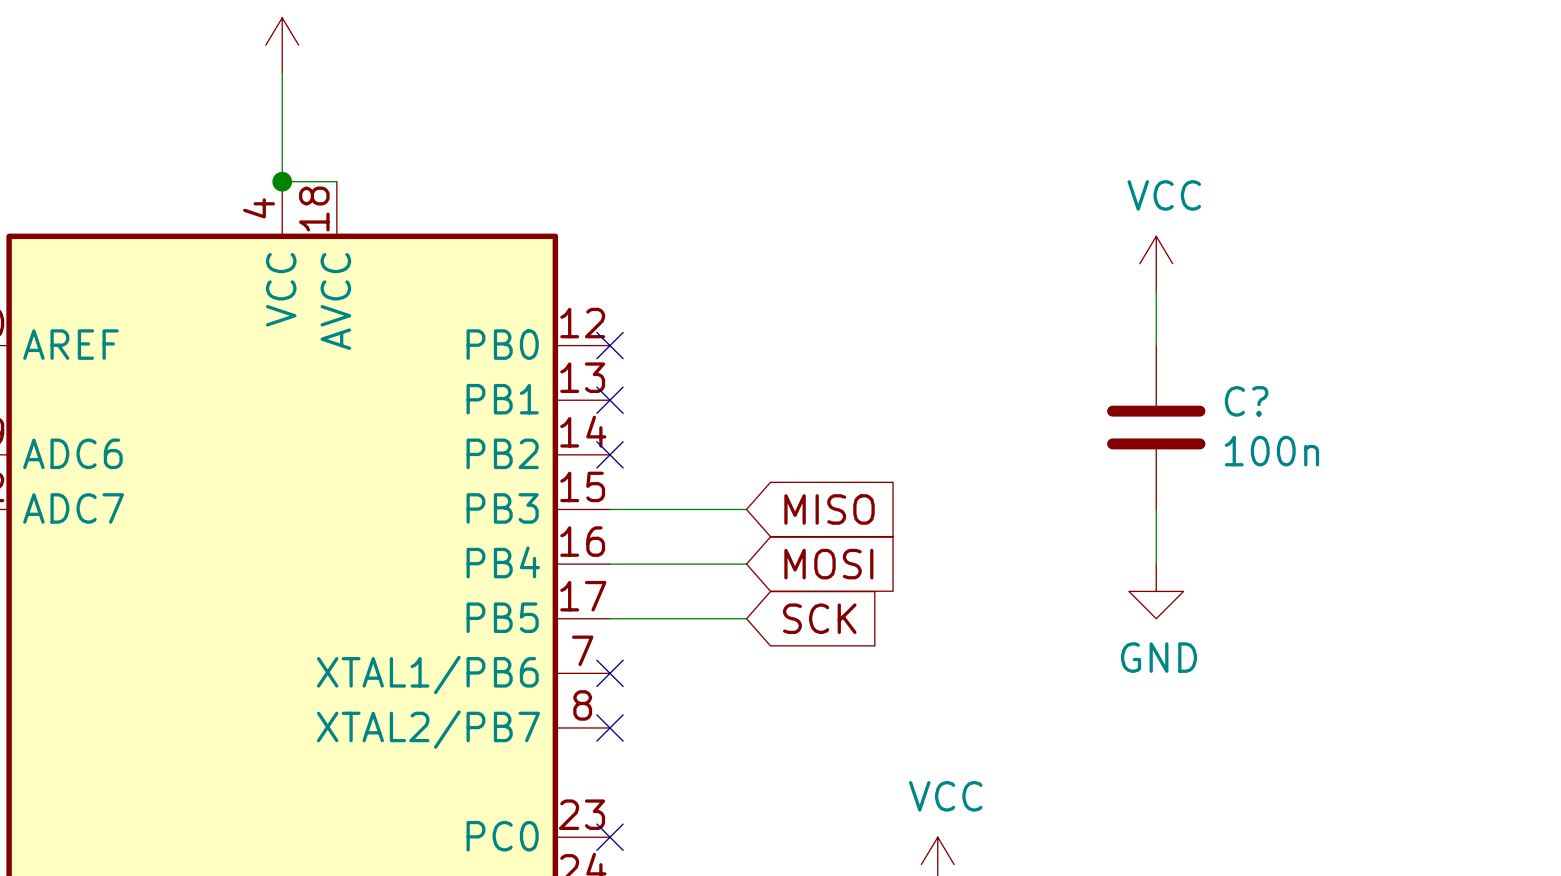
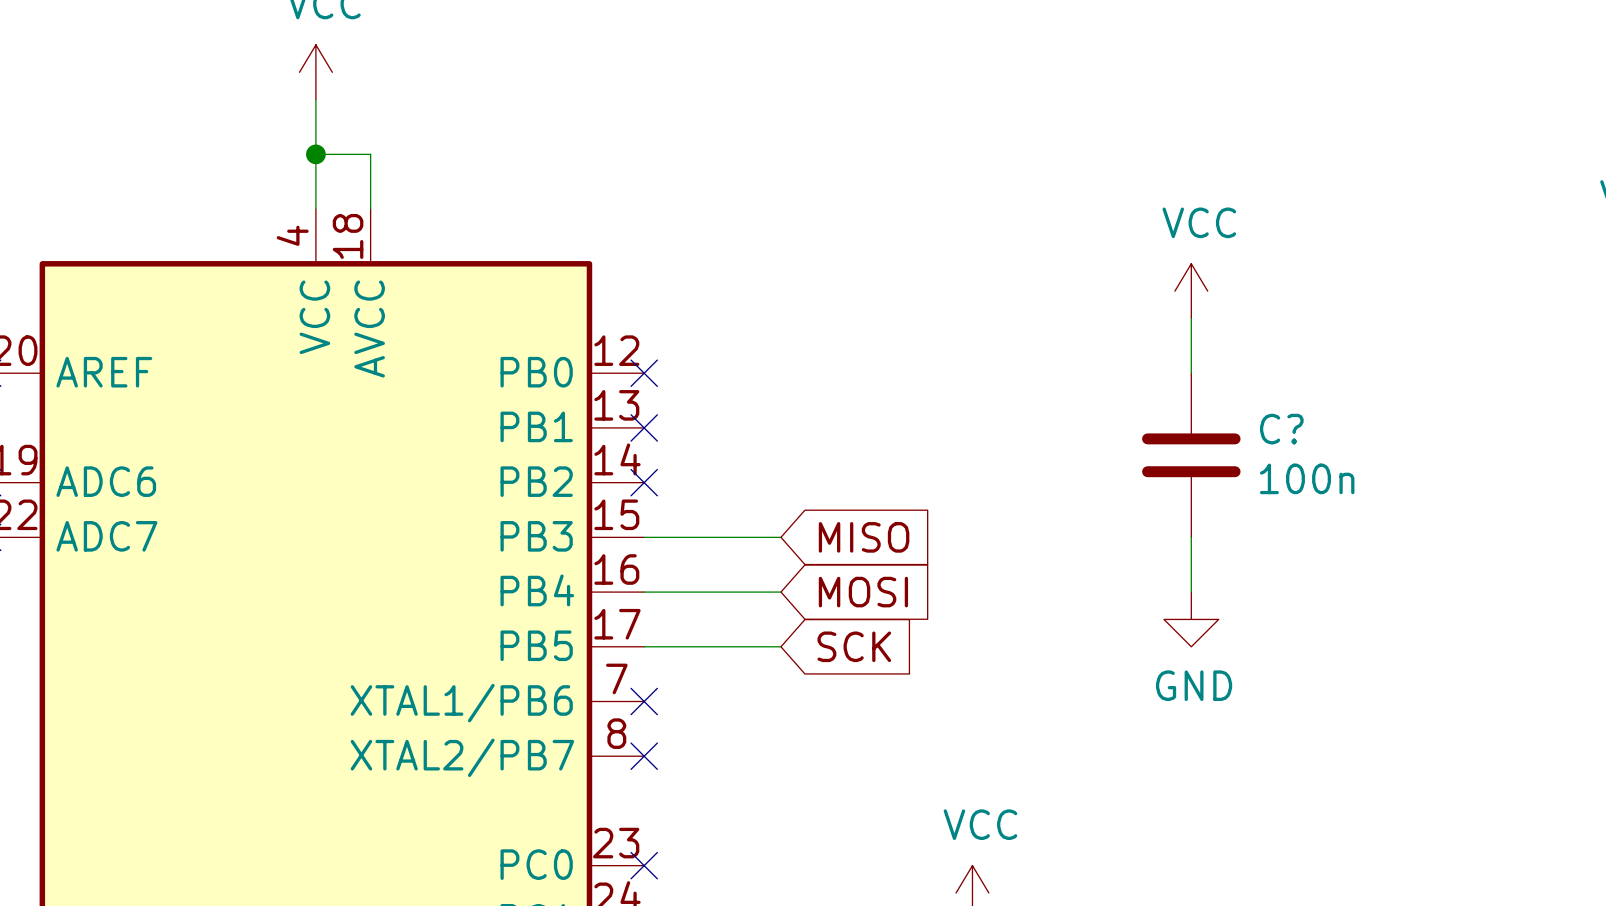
wire: (282, 181) (336, 181) -> (315, 154) (370, 154) (370, 209)
junction position: (282, 181) -> (315, 154)

